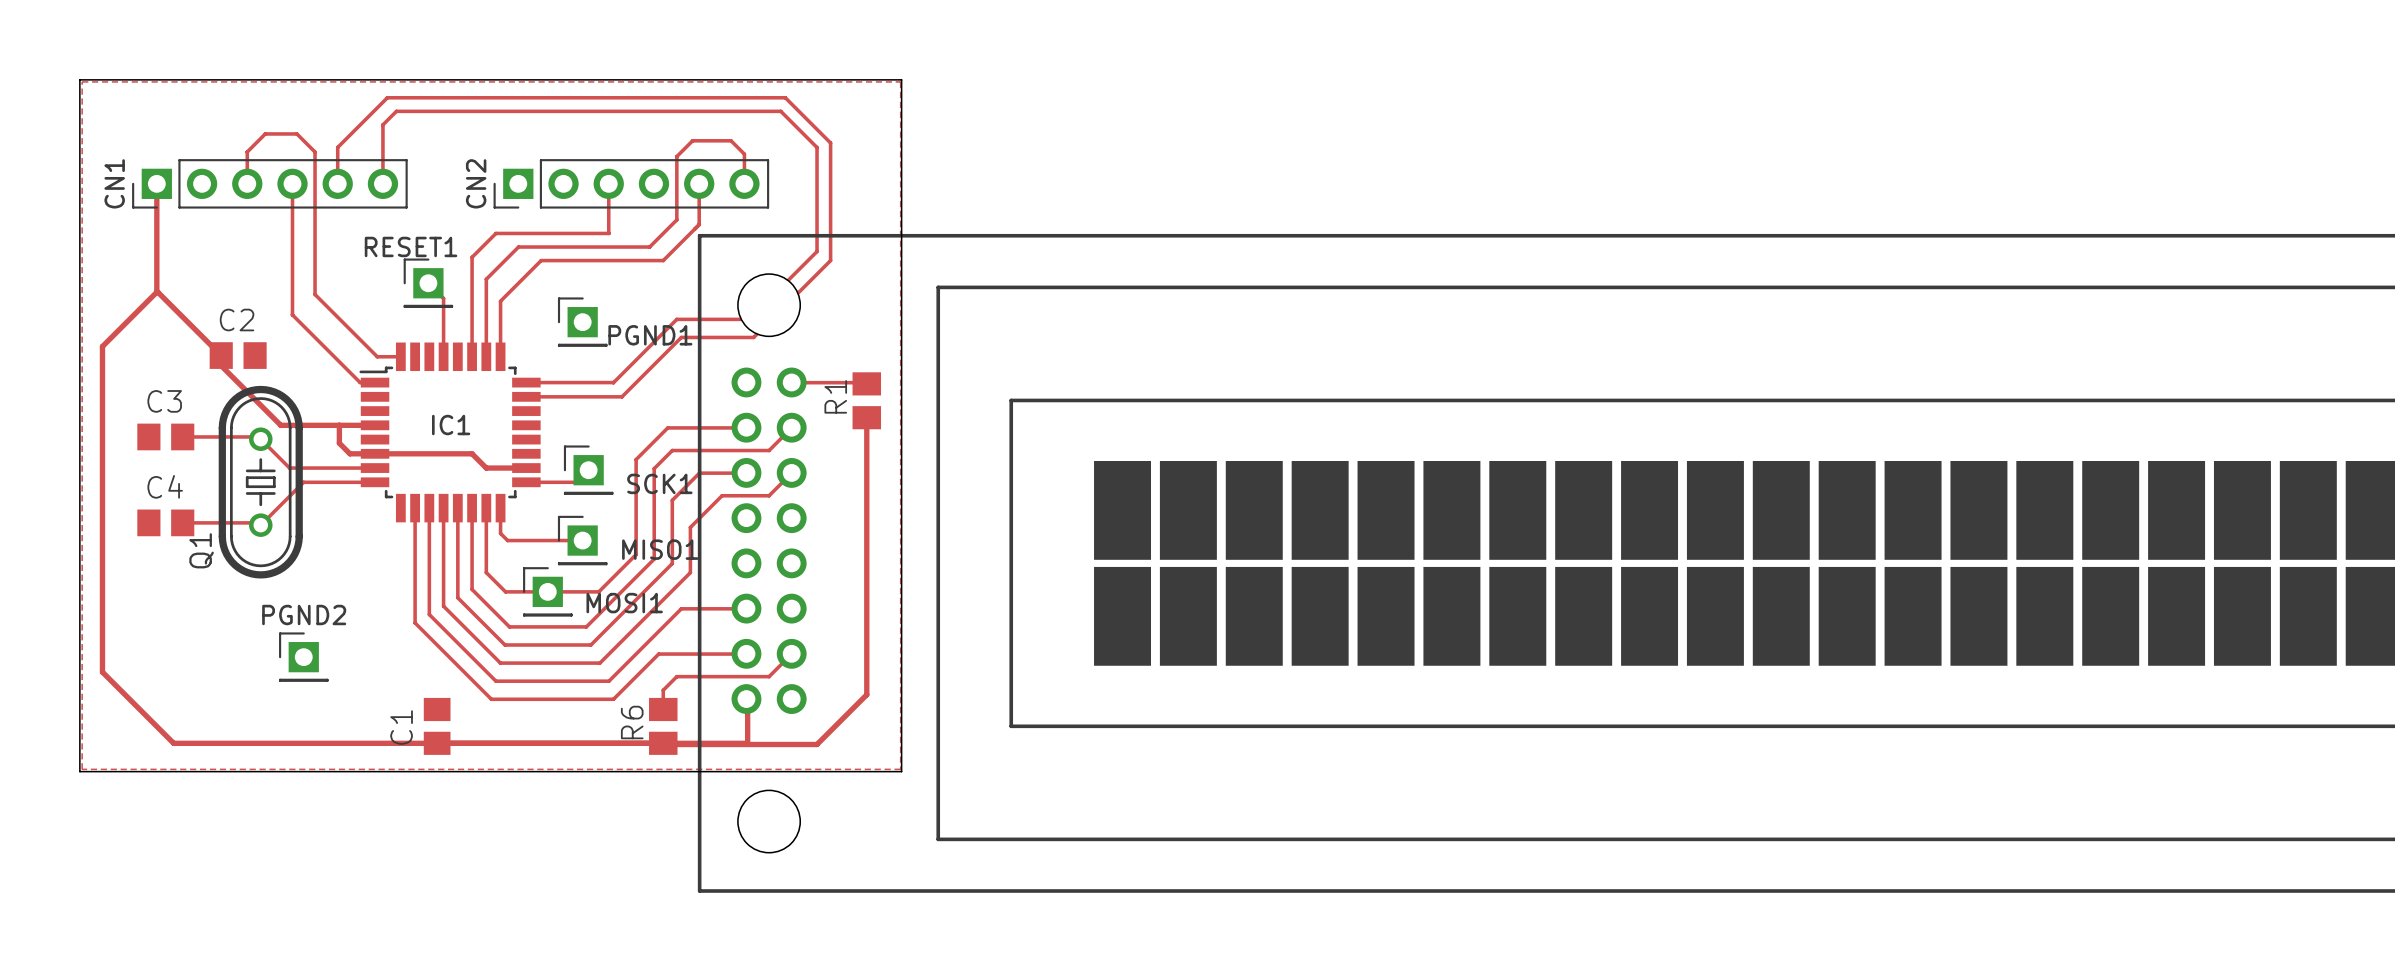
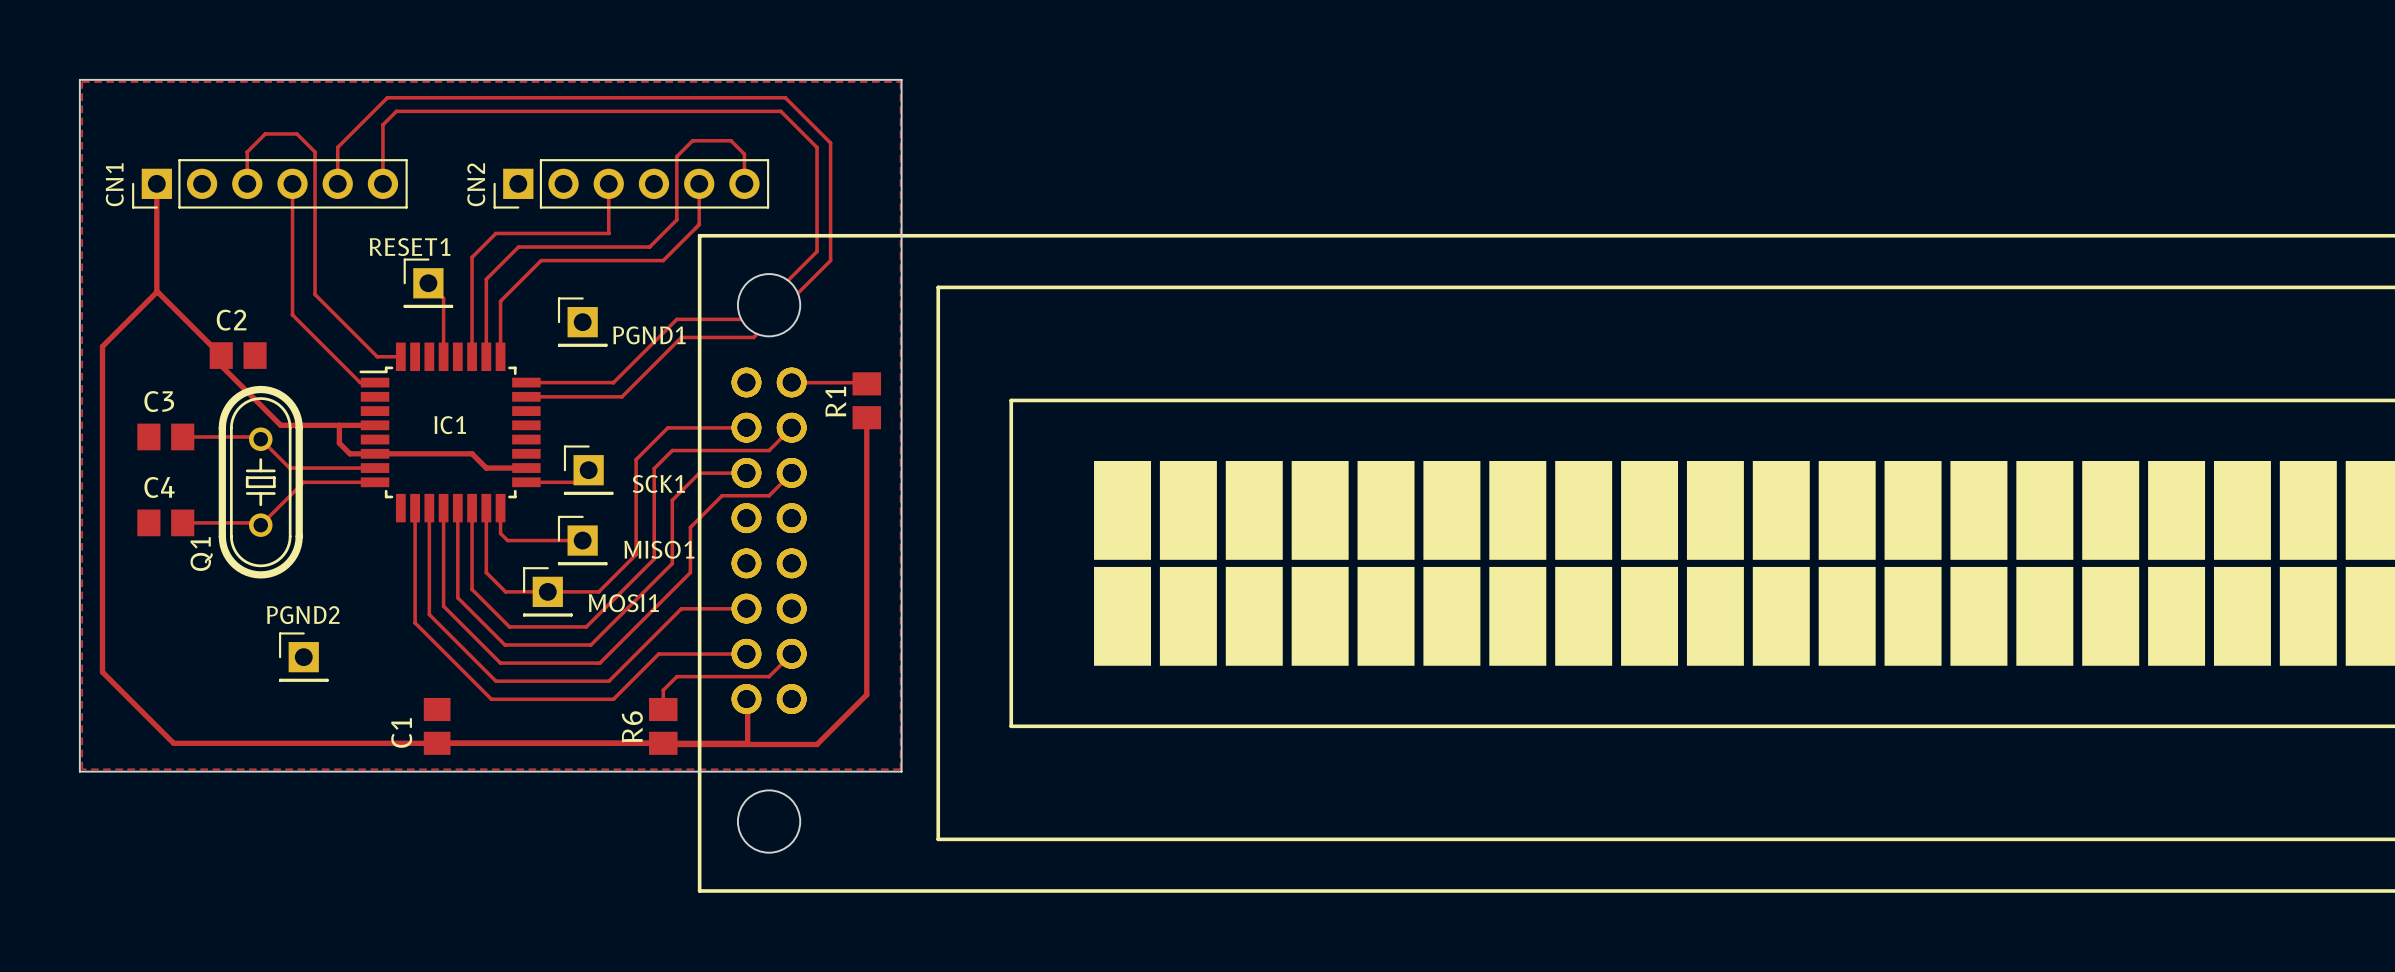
part: none -> (769, 540)

